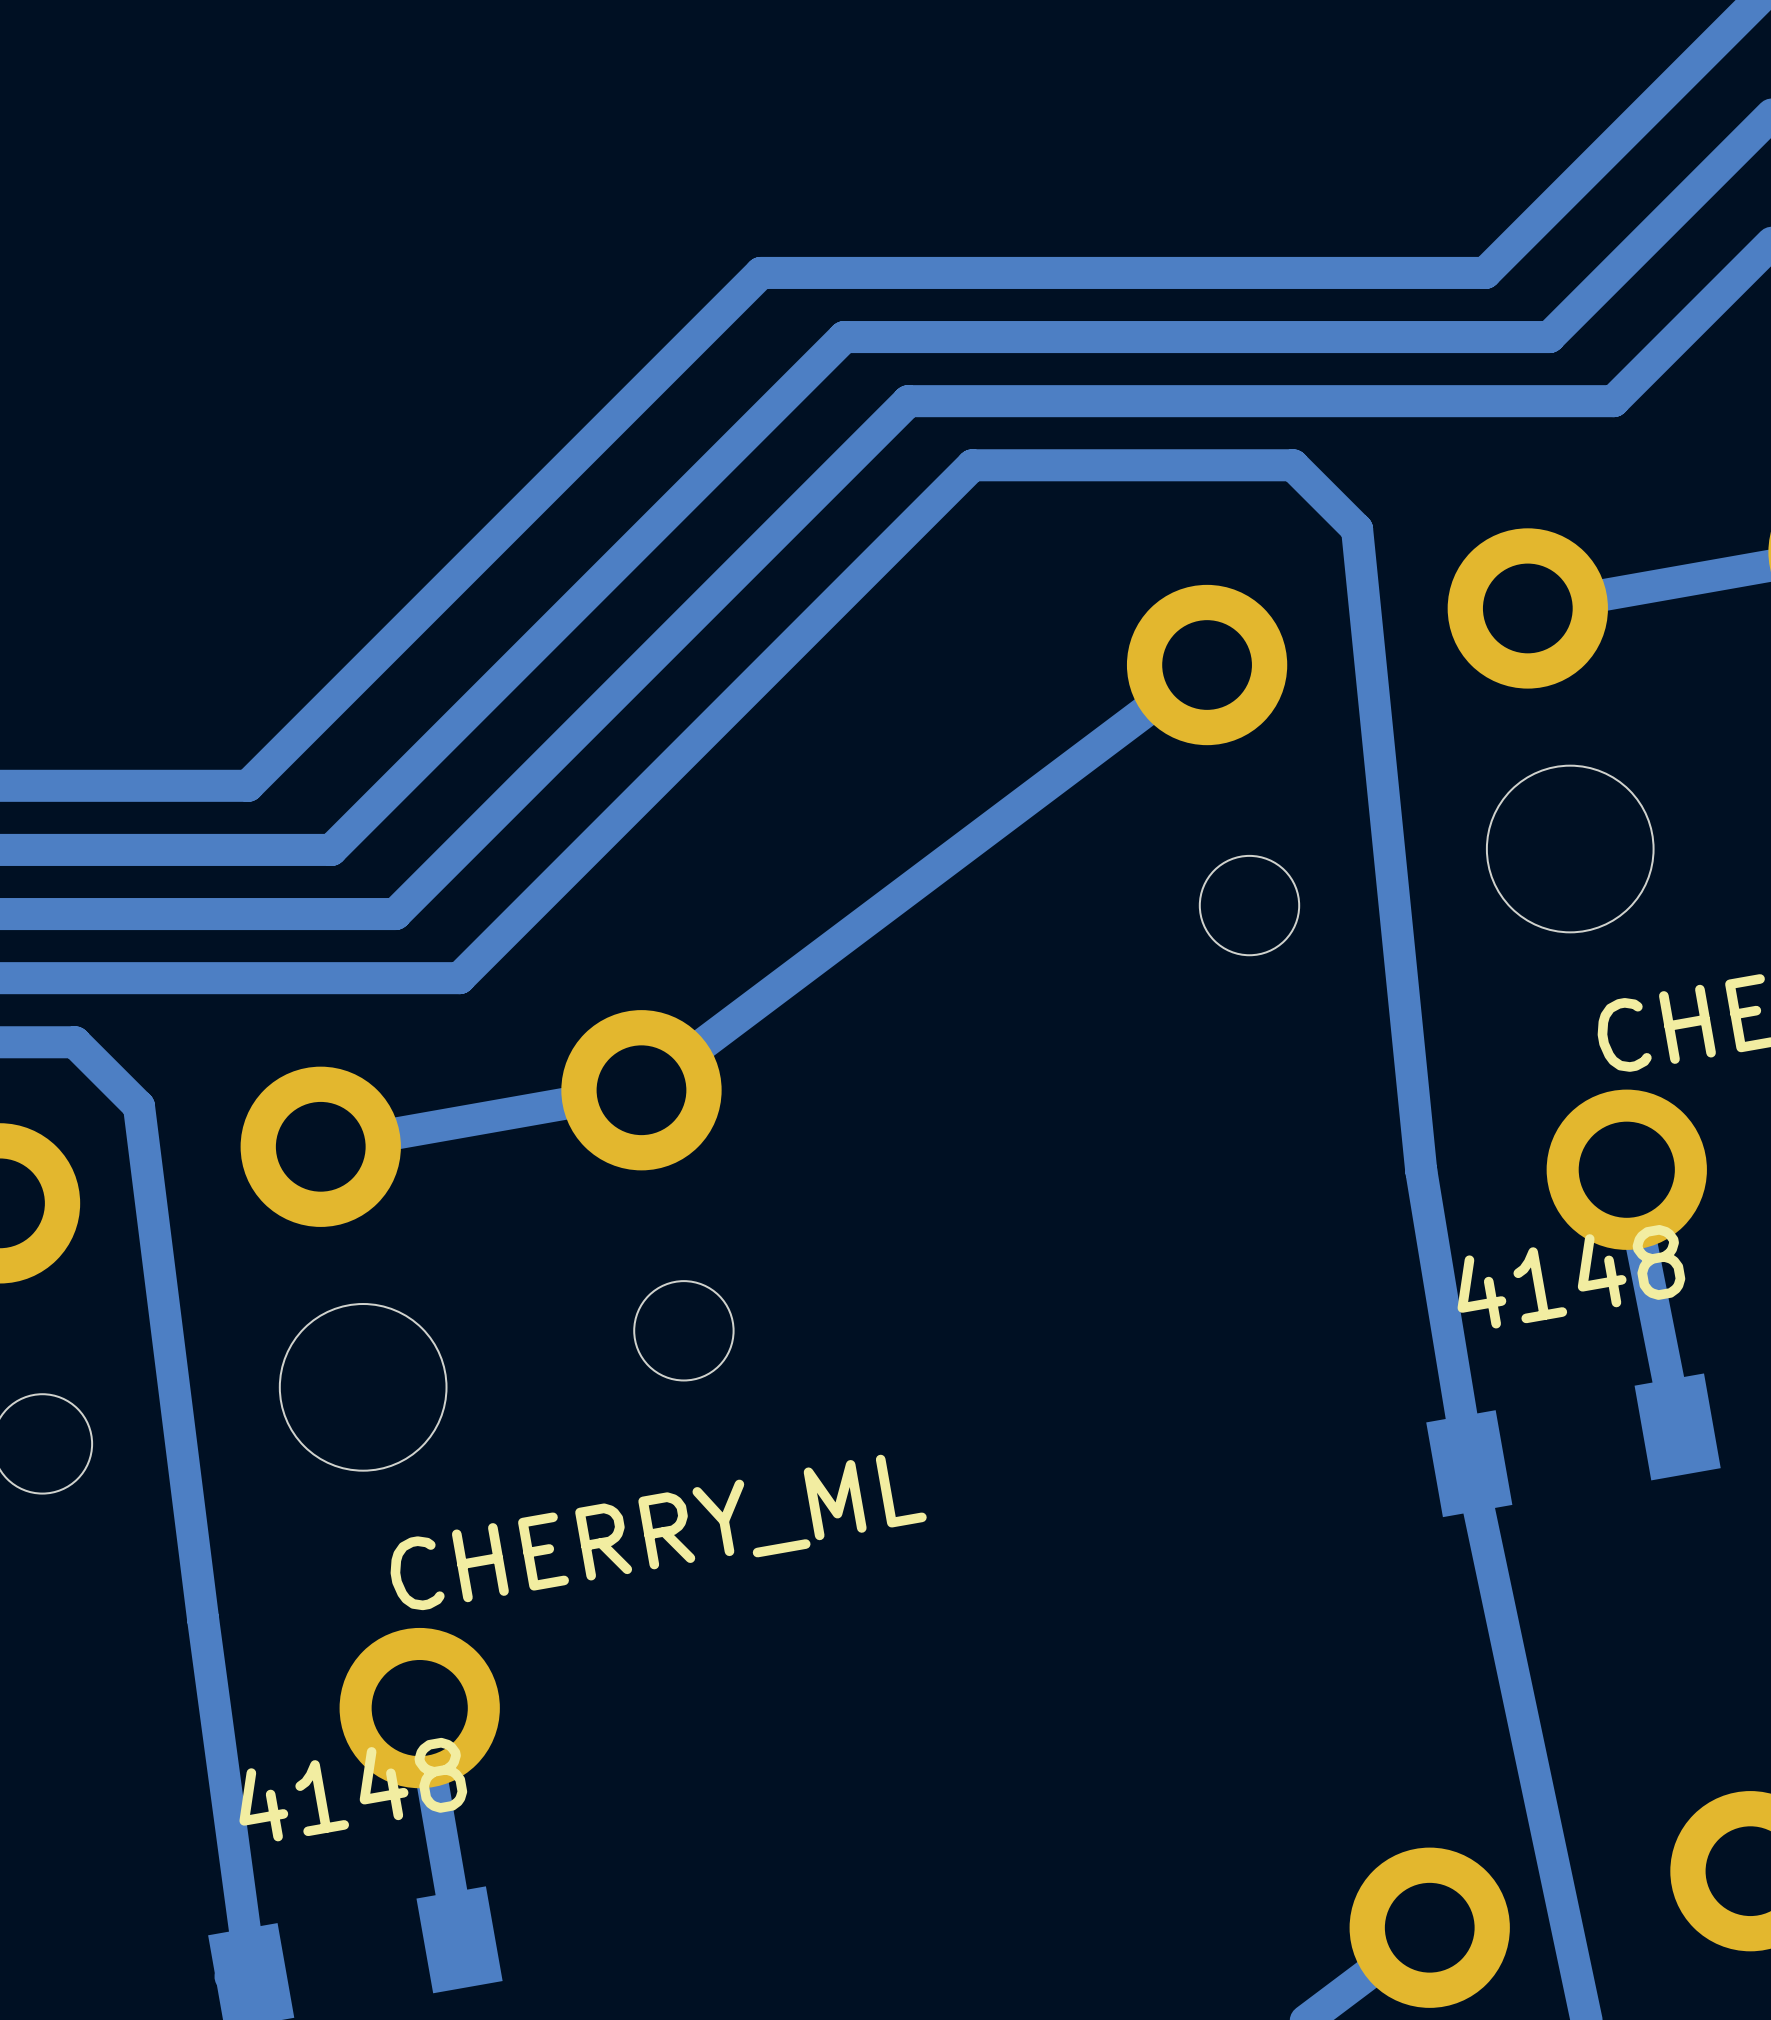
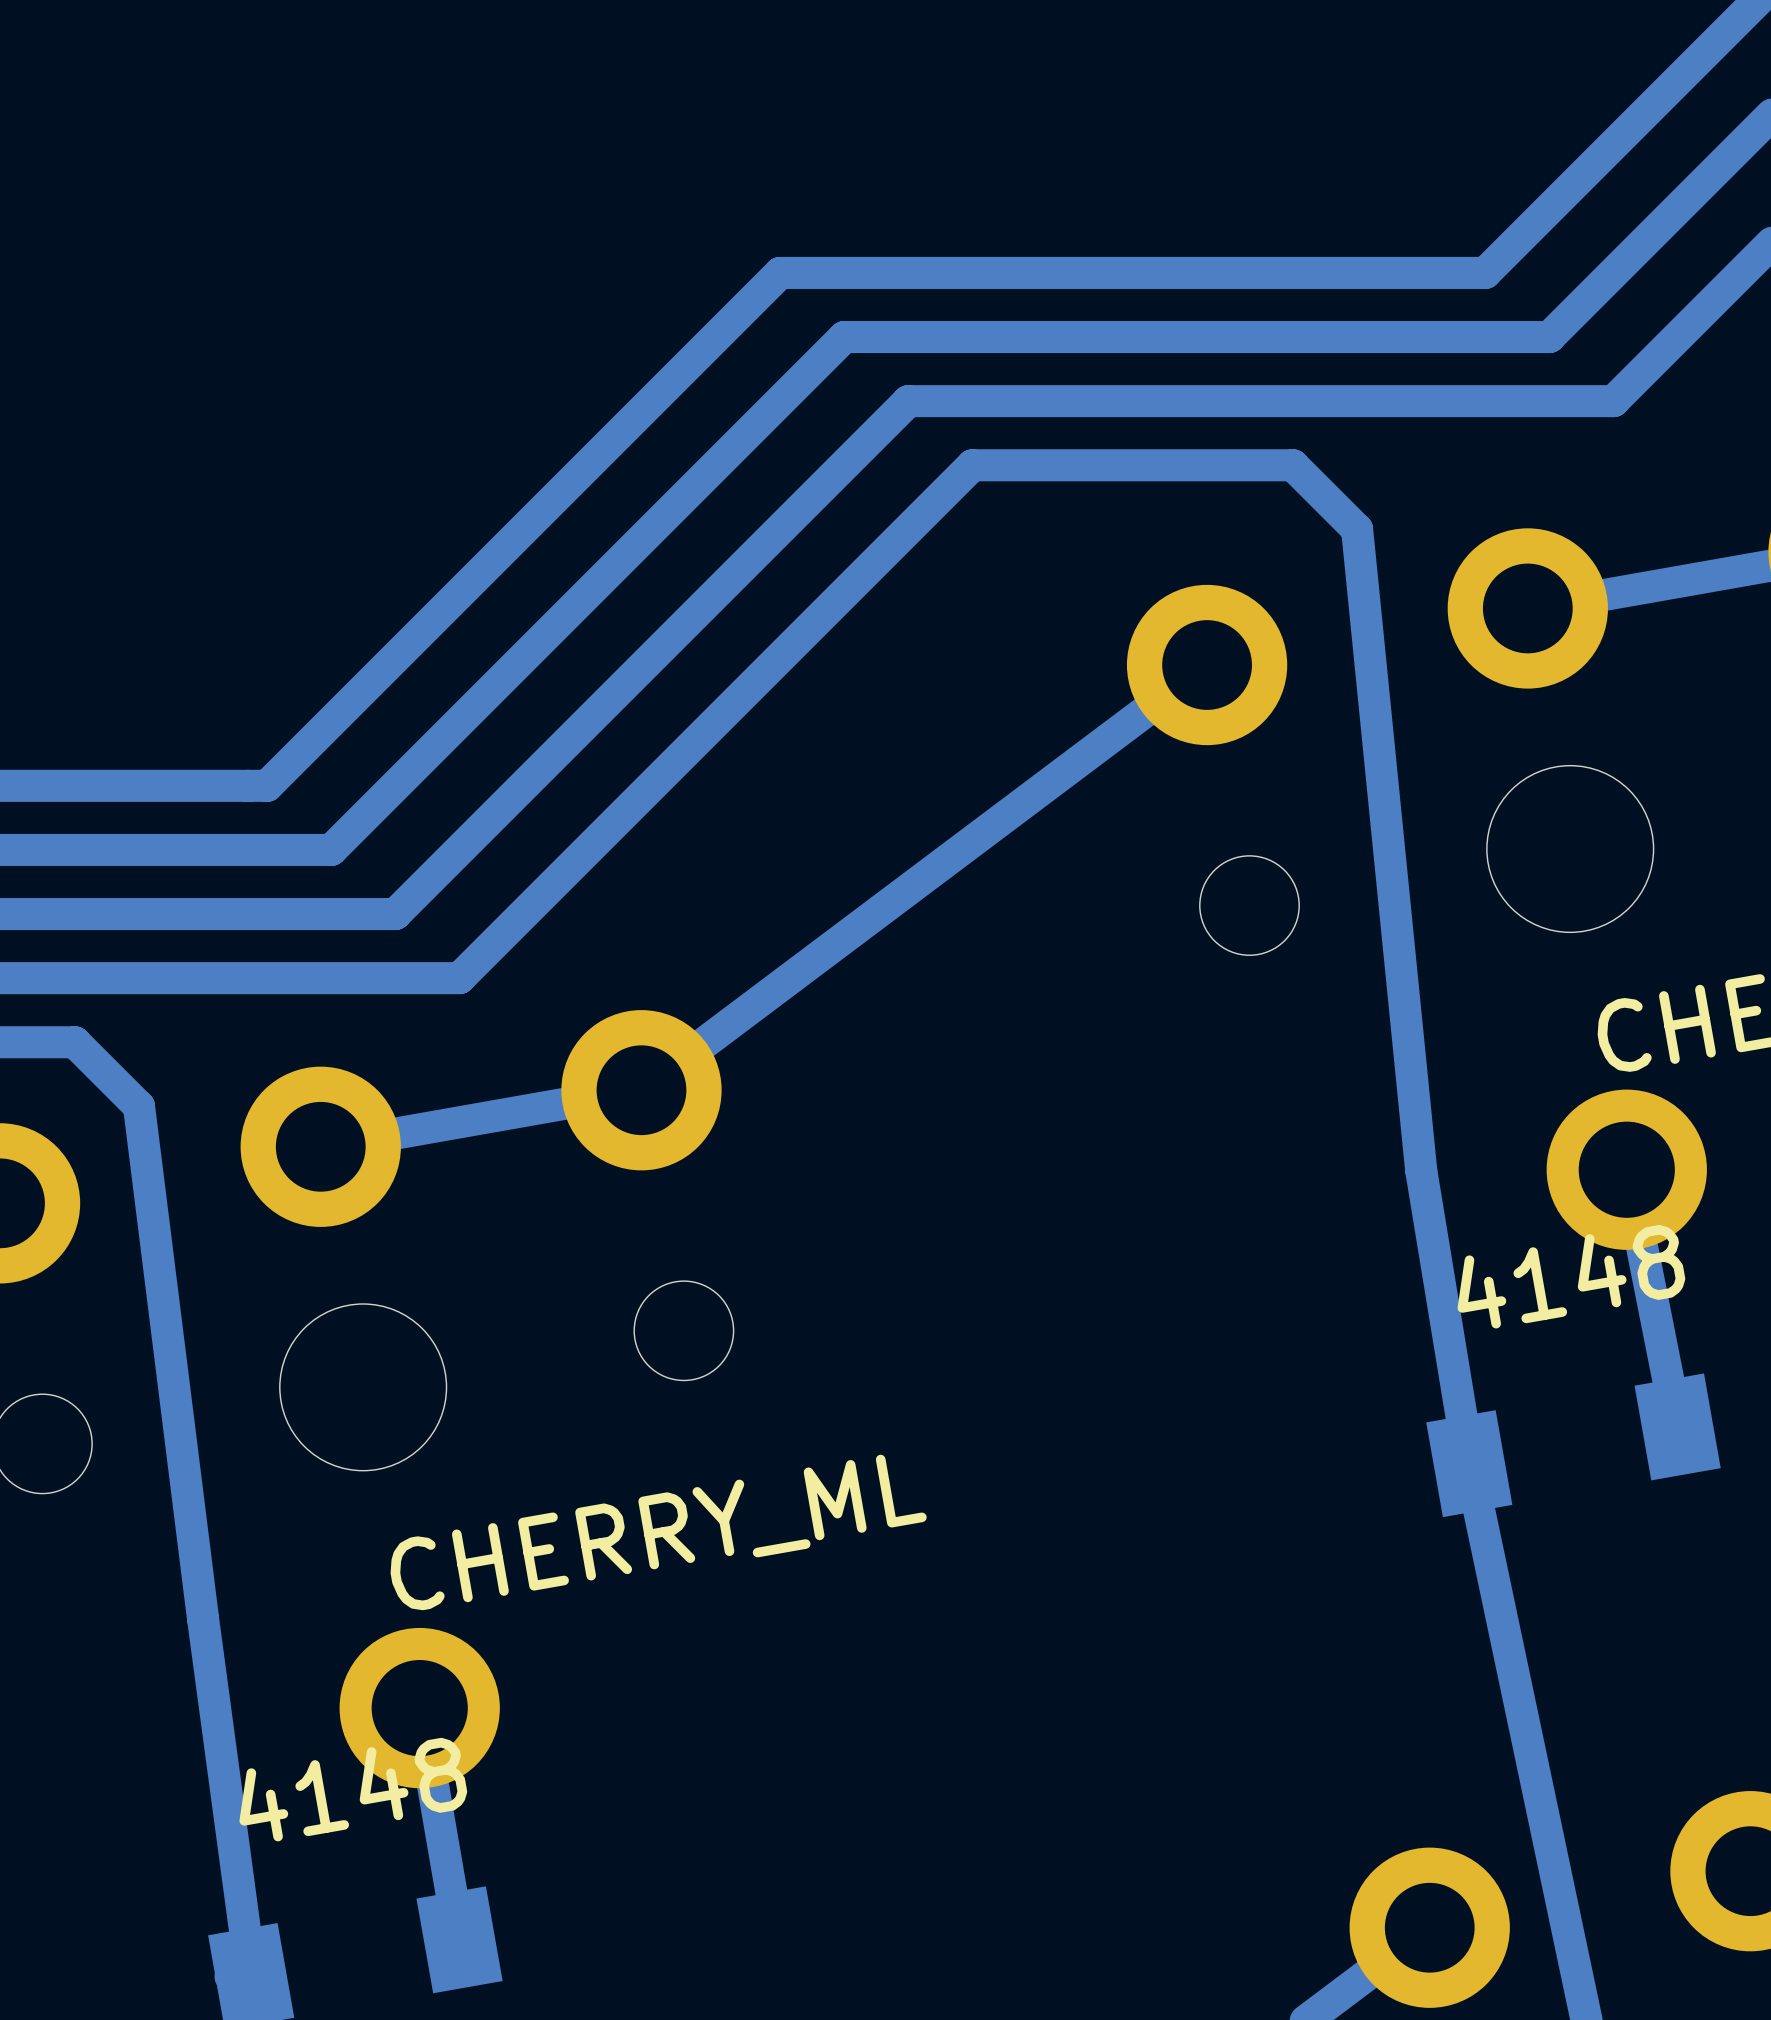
bottom track: (780, 272) (760, 272) (247, 785) -> (780, 272) (267, 785) (247, 785)

